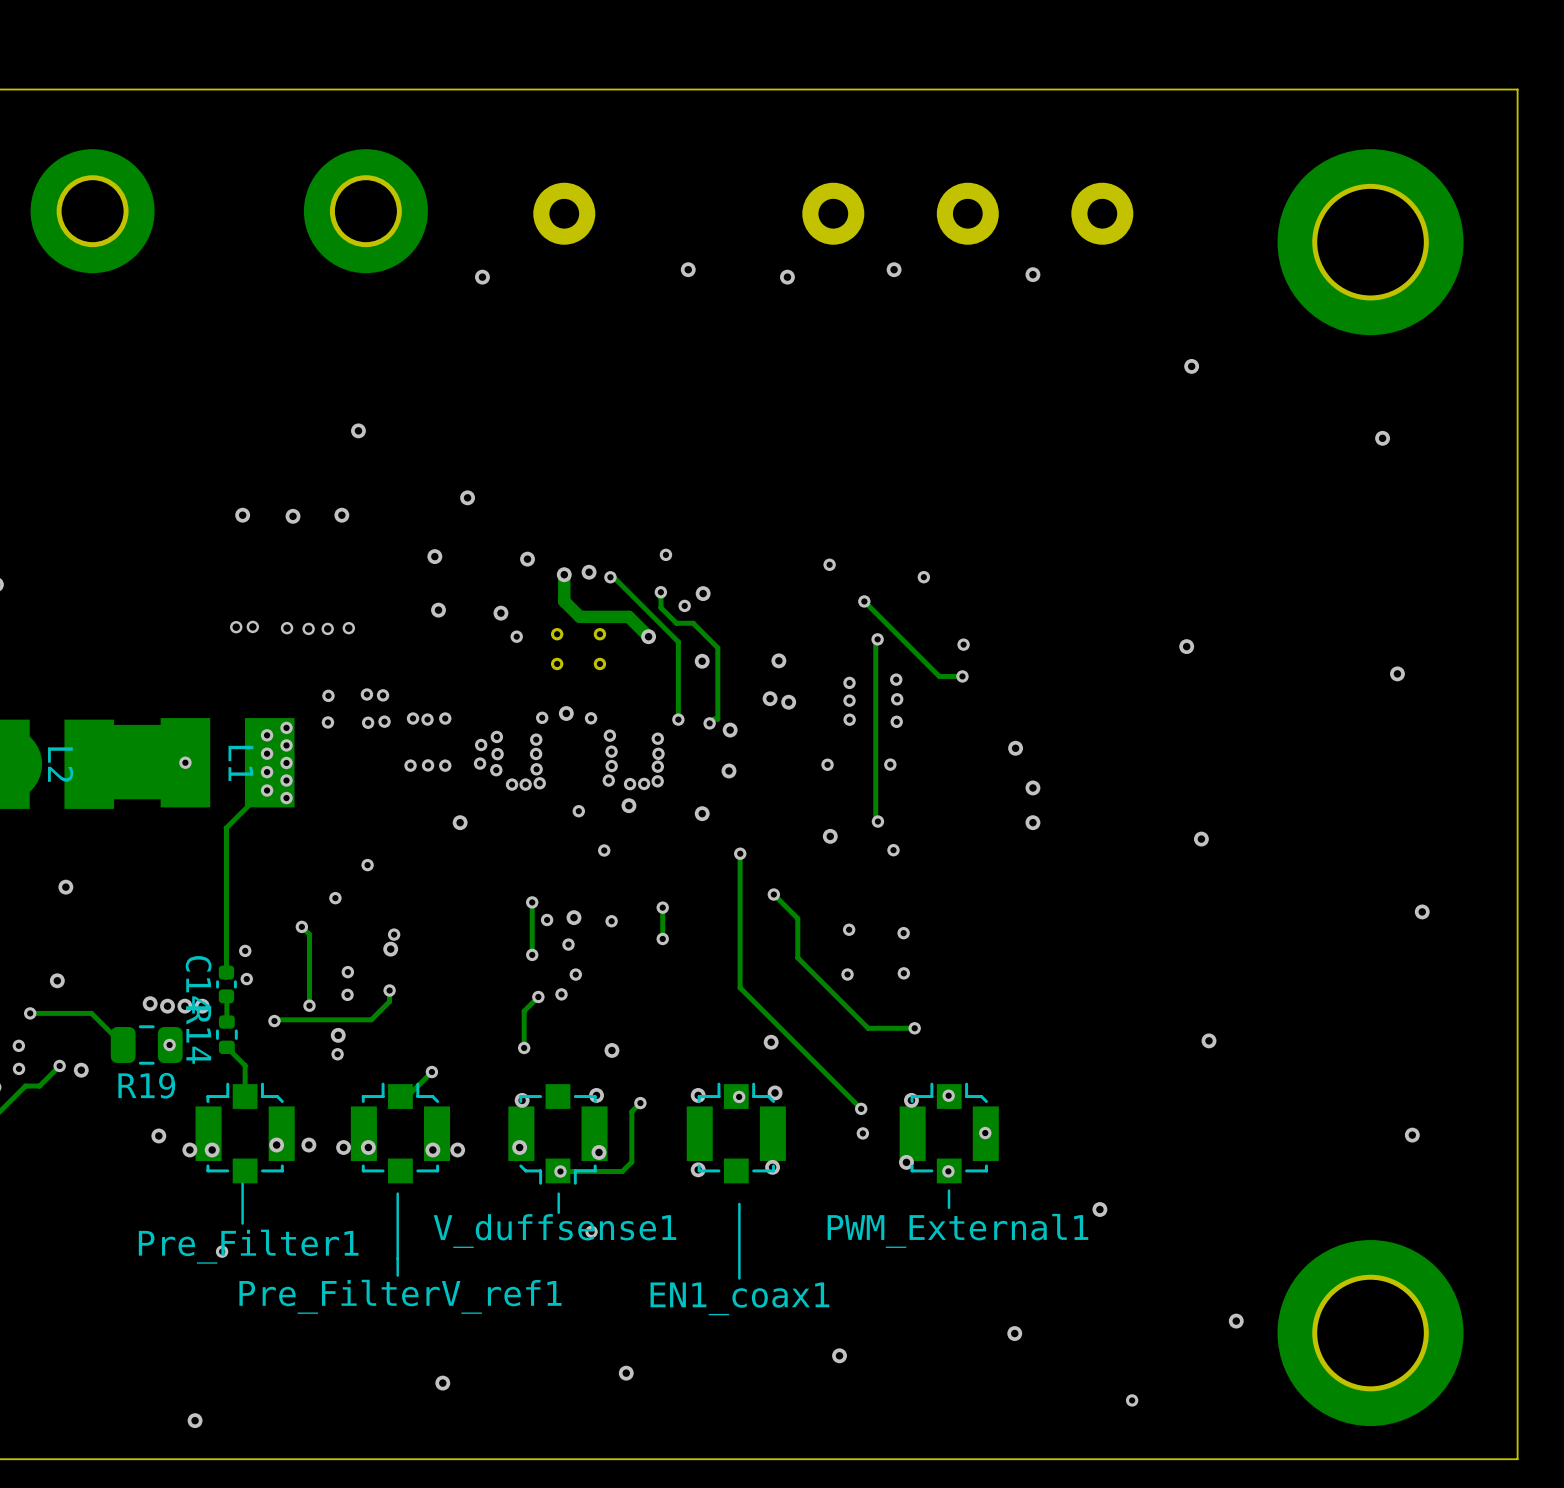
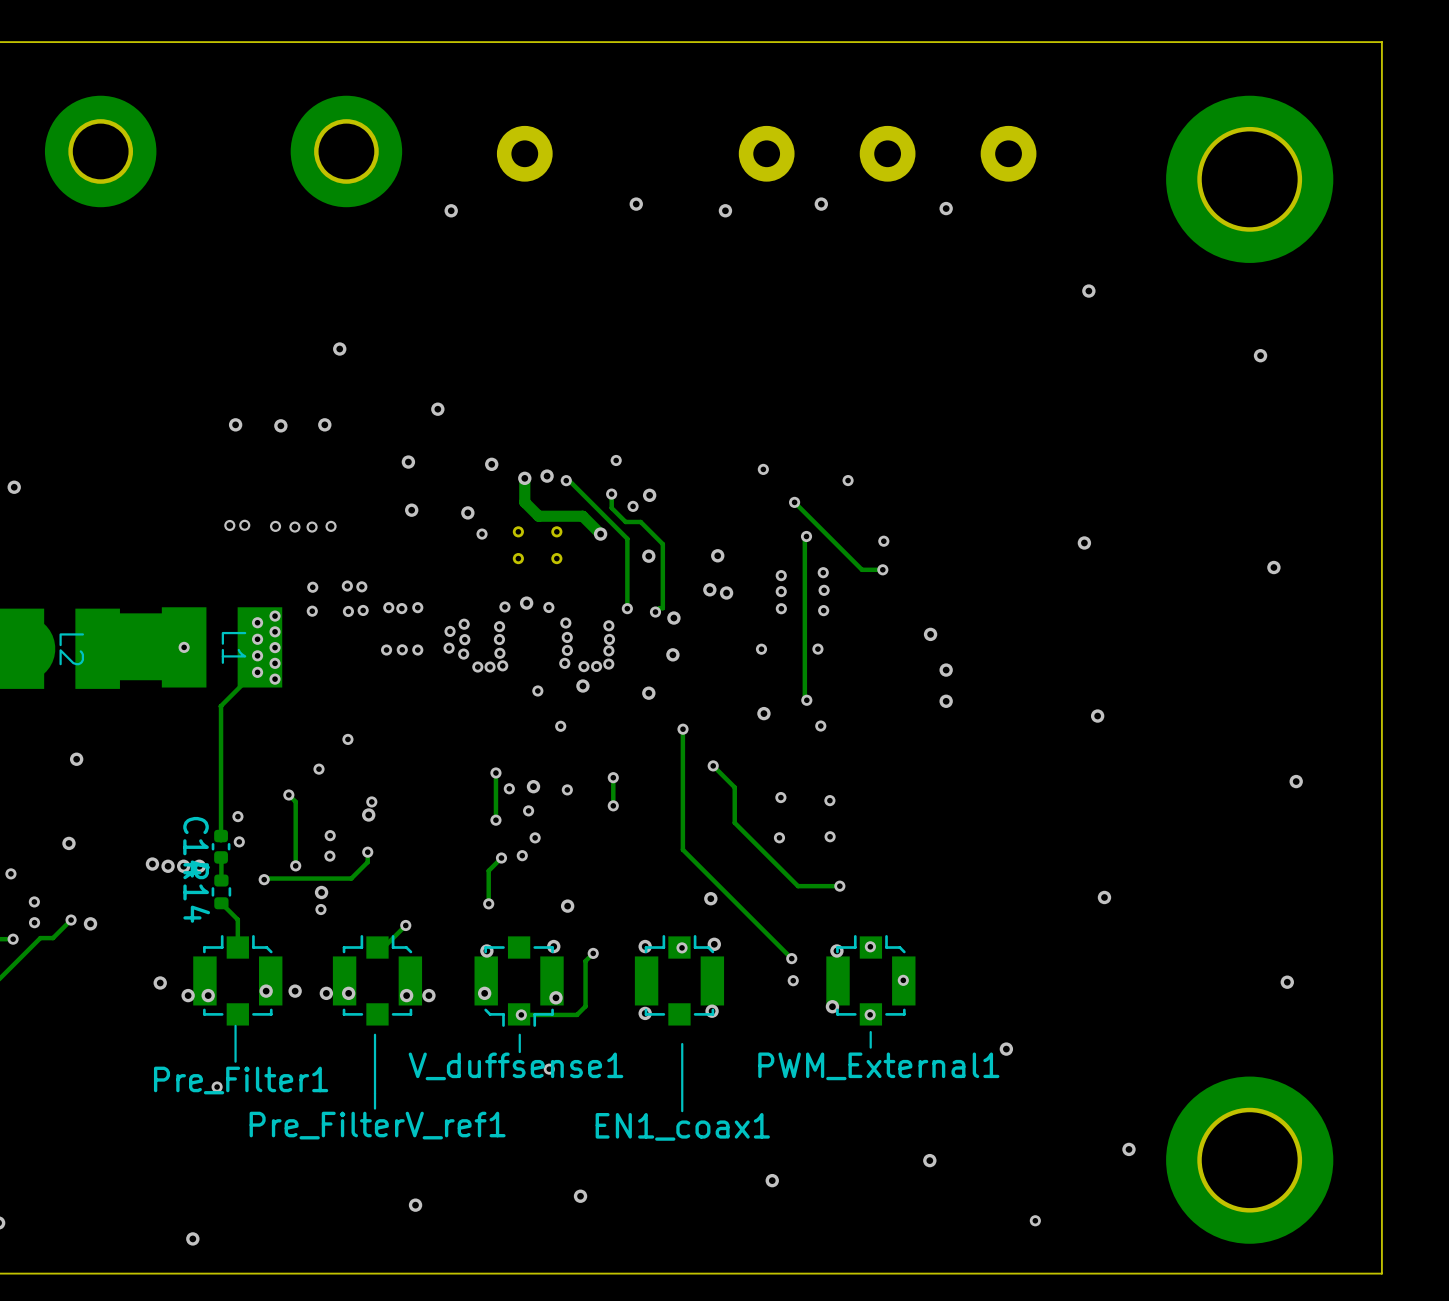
via: (460, 822) -> none
track: (30, 1013) (91, 1013) (123, 1044) -> none
via: (30, 1013) -> none
R19: (146, 1044) -> none
via: (169, 1044) -> none

